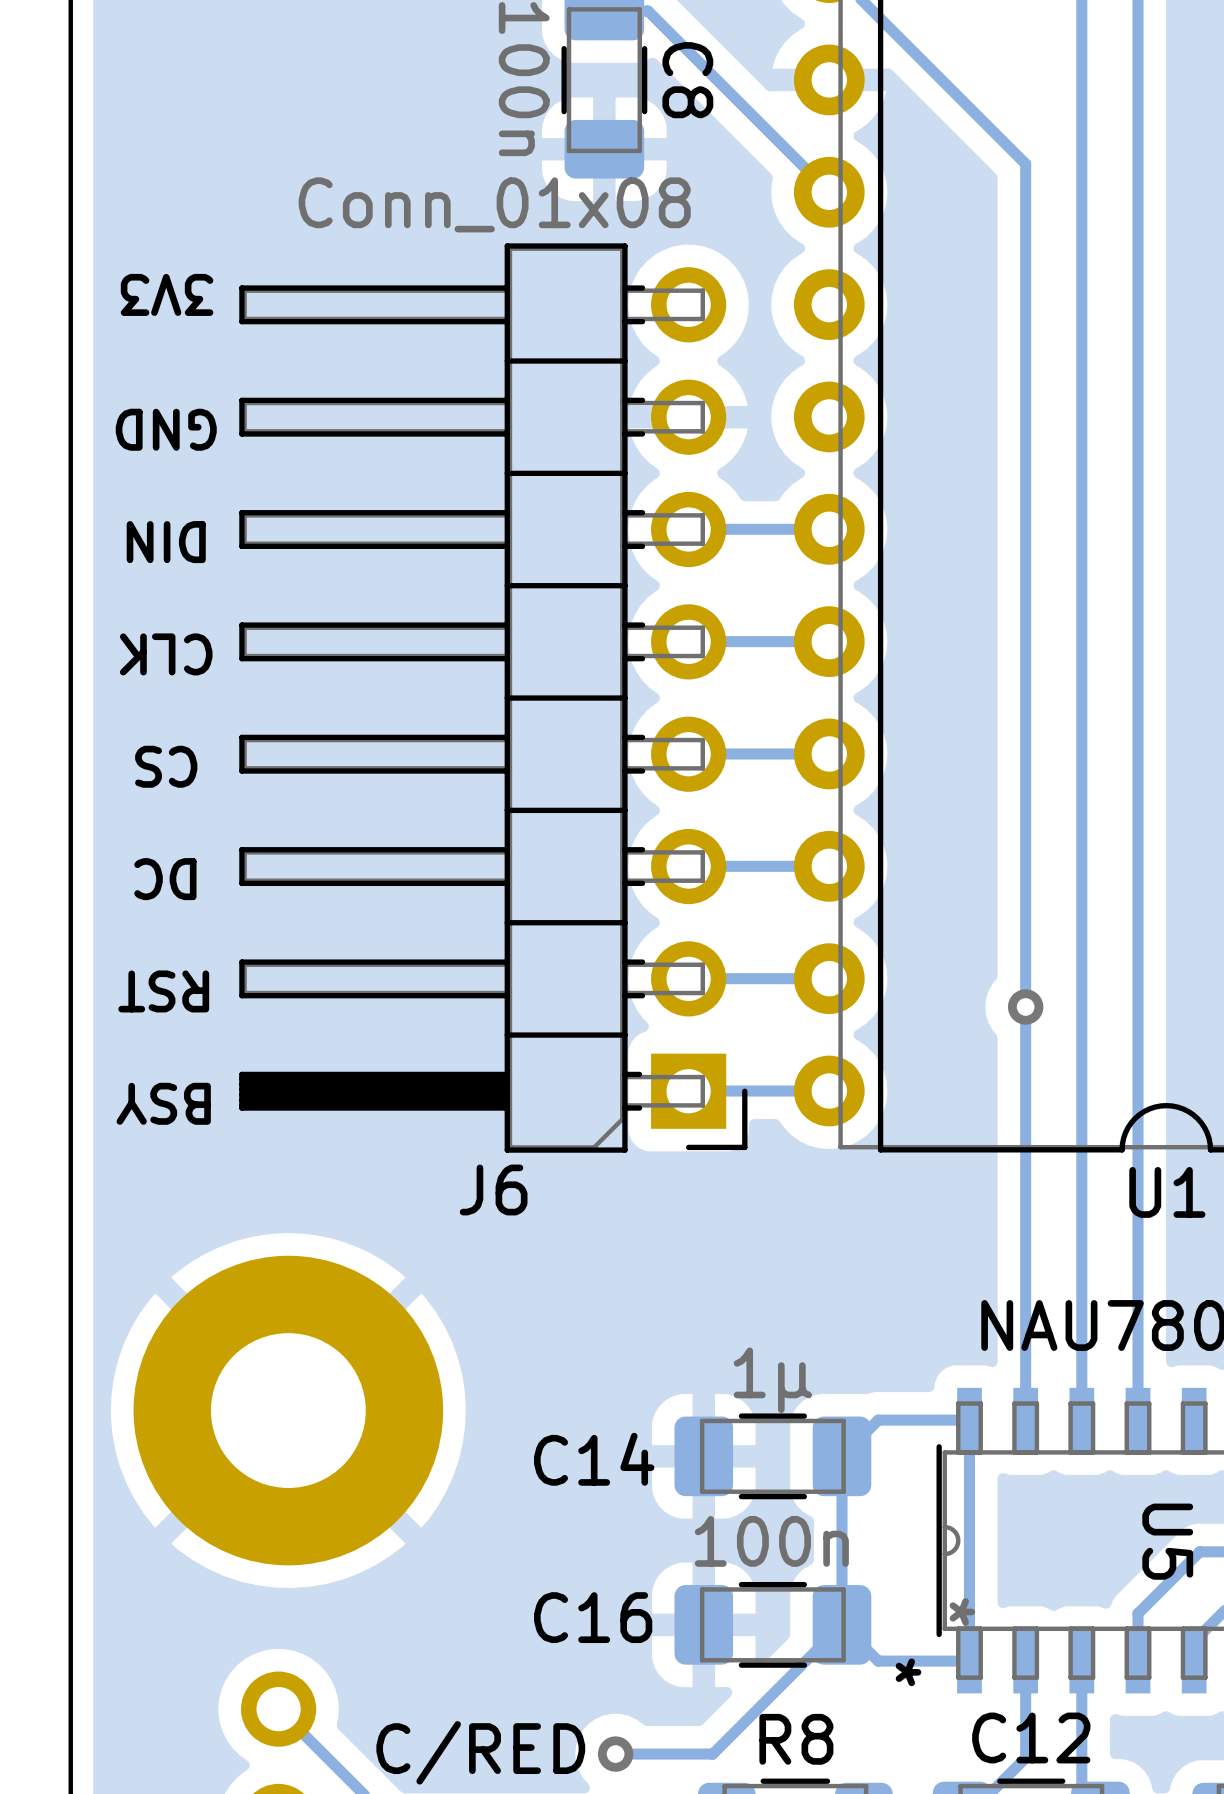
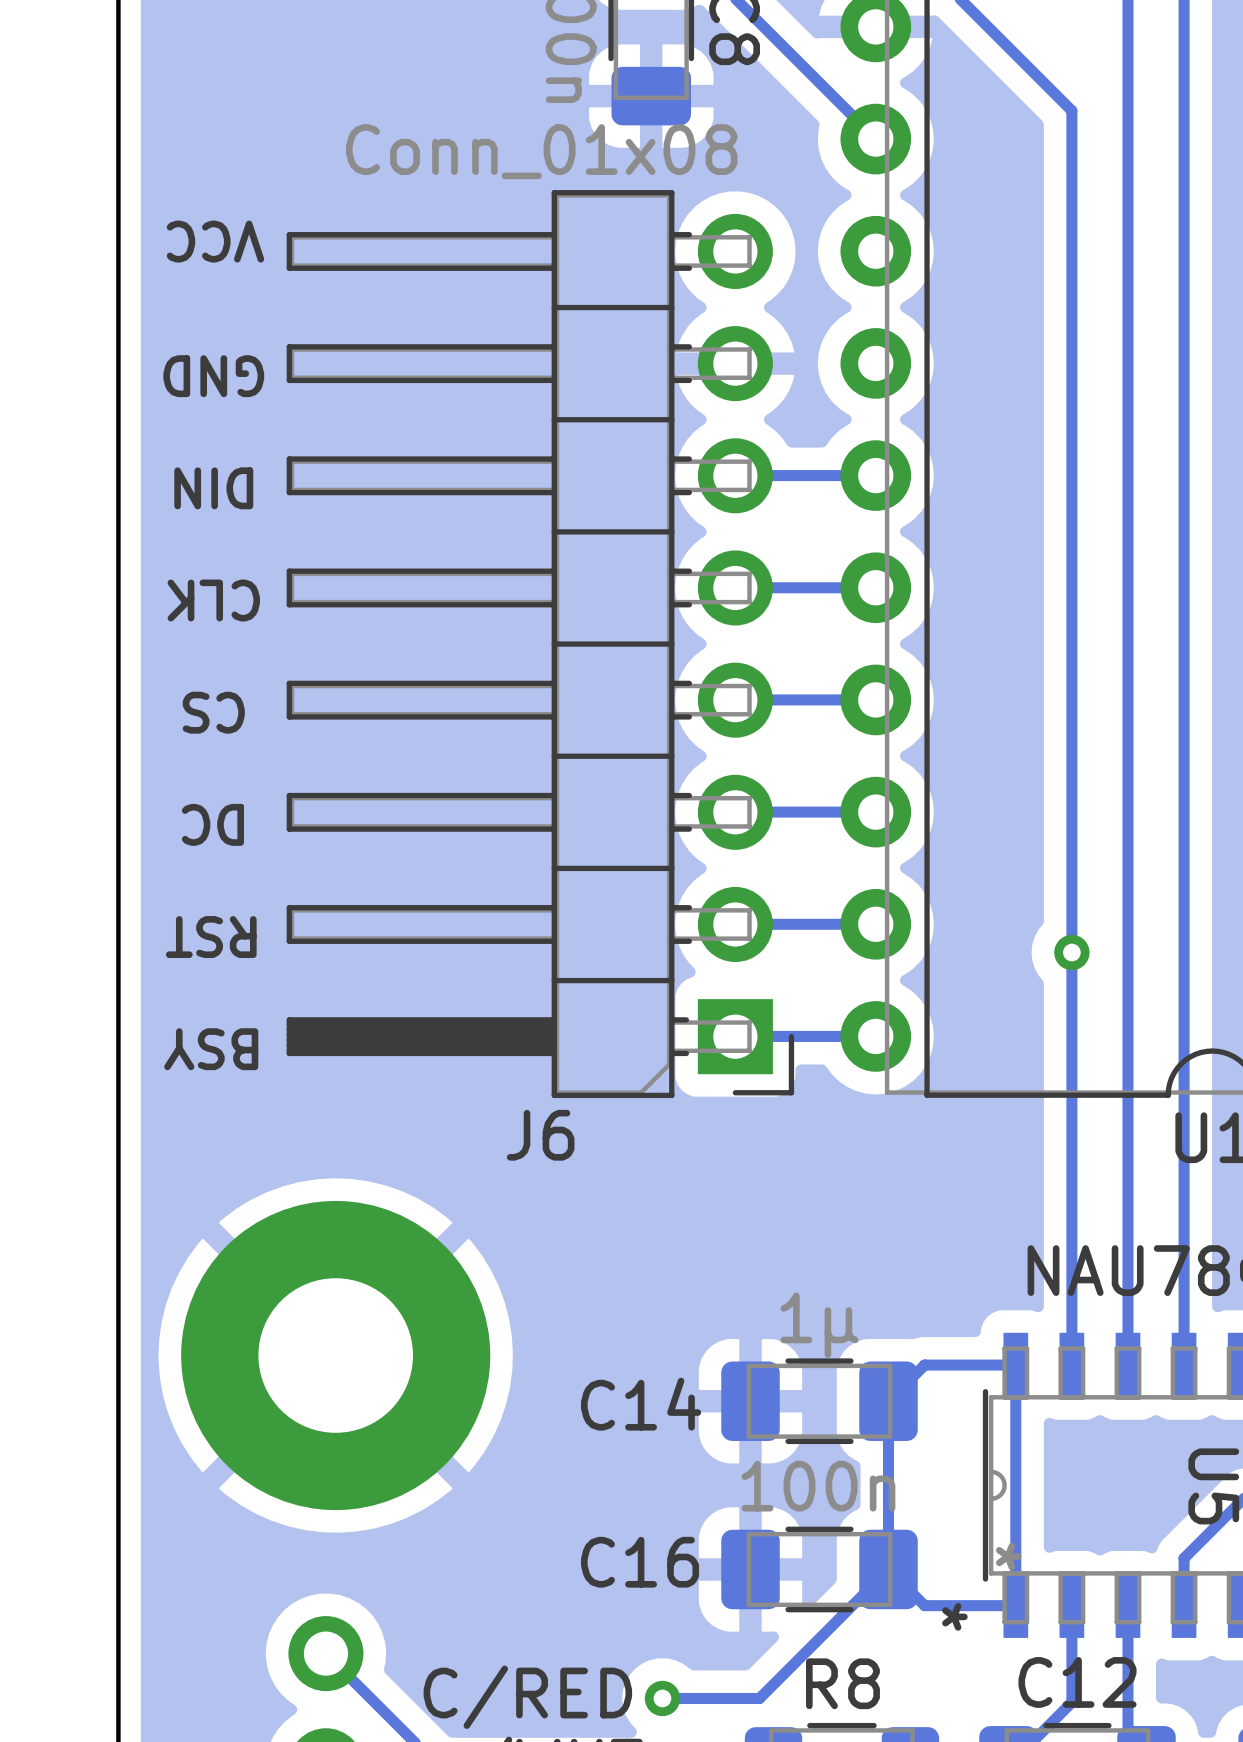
text: 3V3 (167, 294) -> VCC (215, 241)

